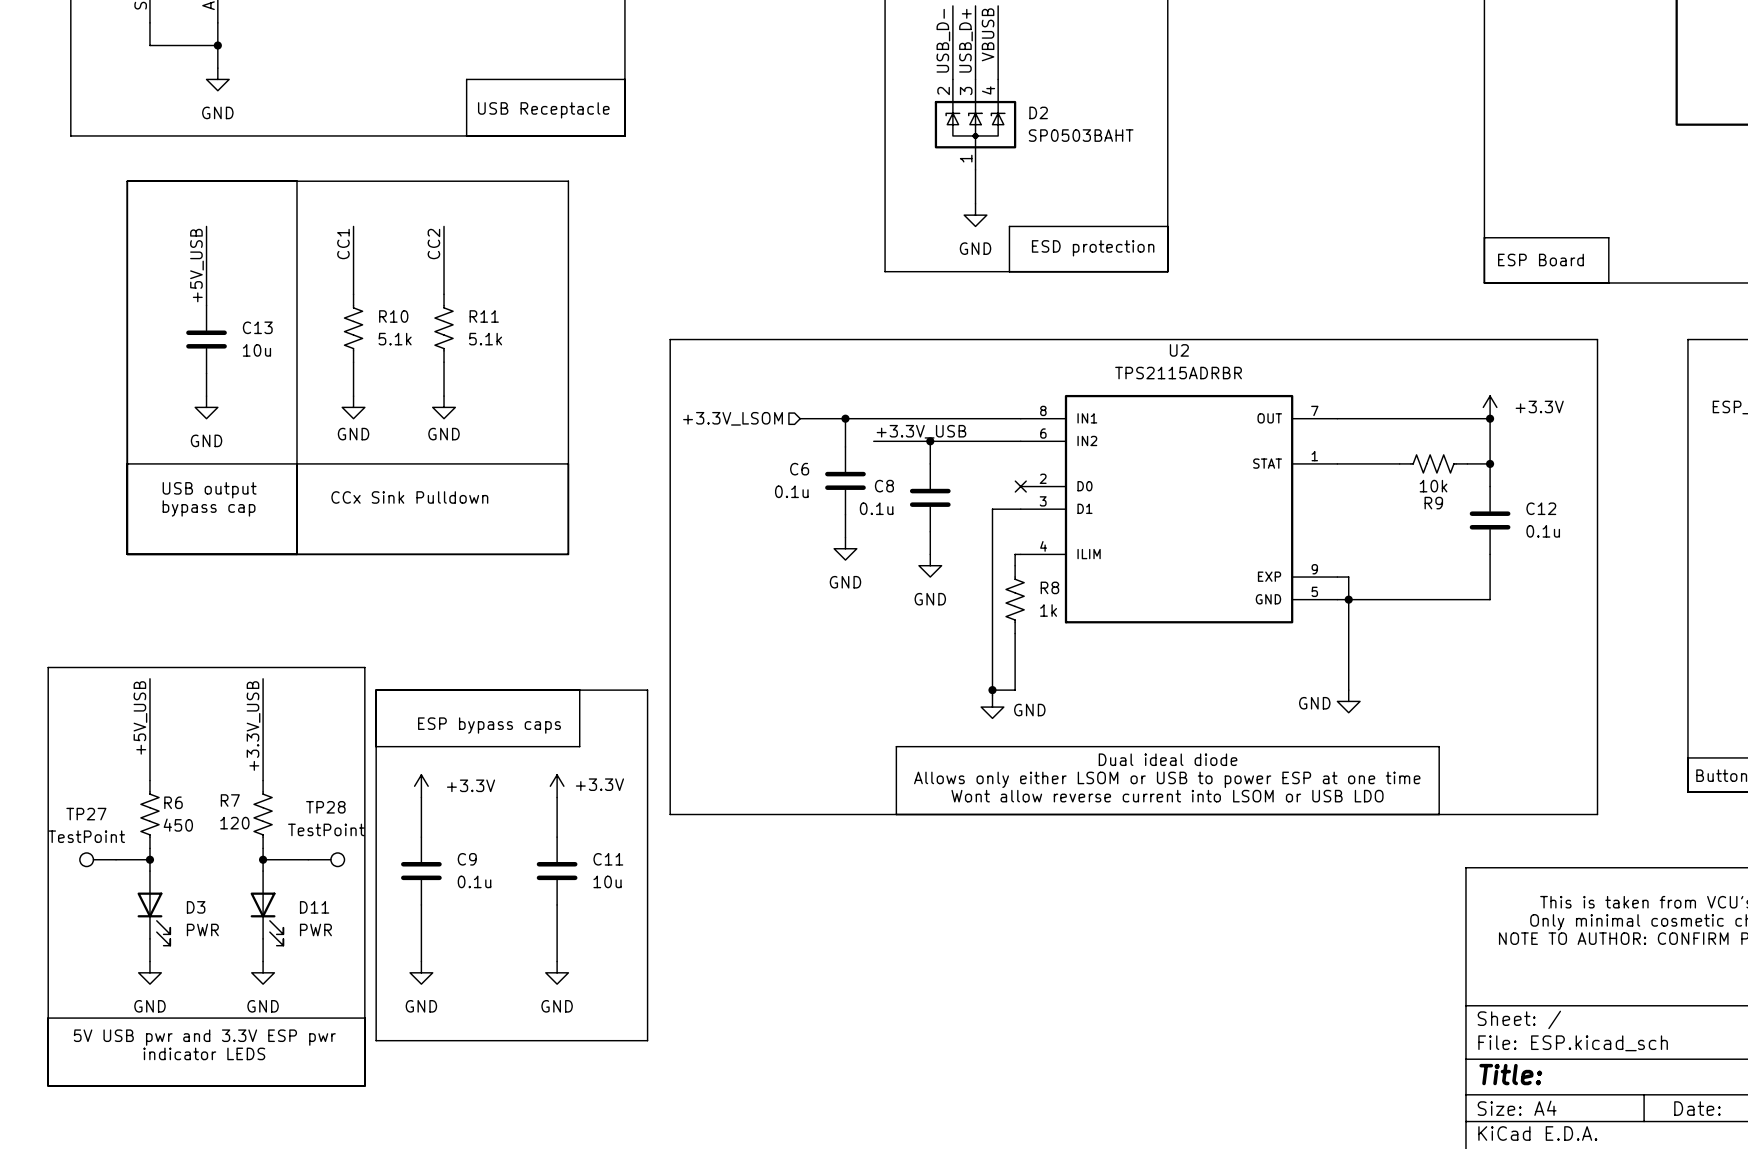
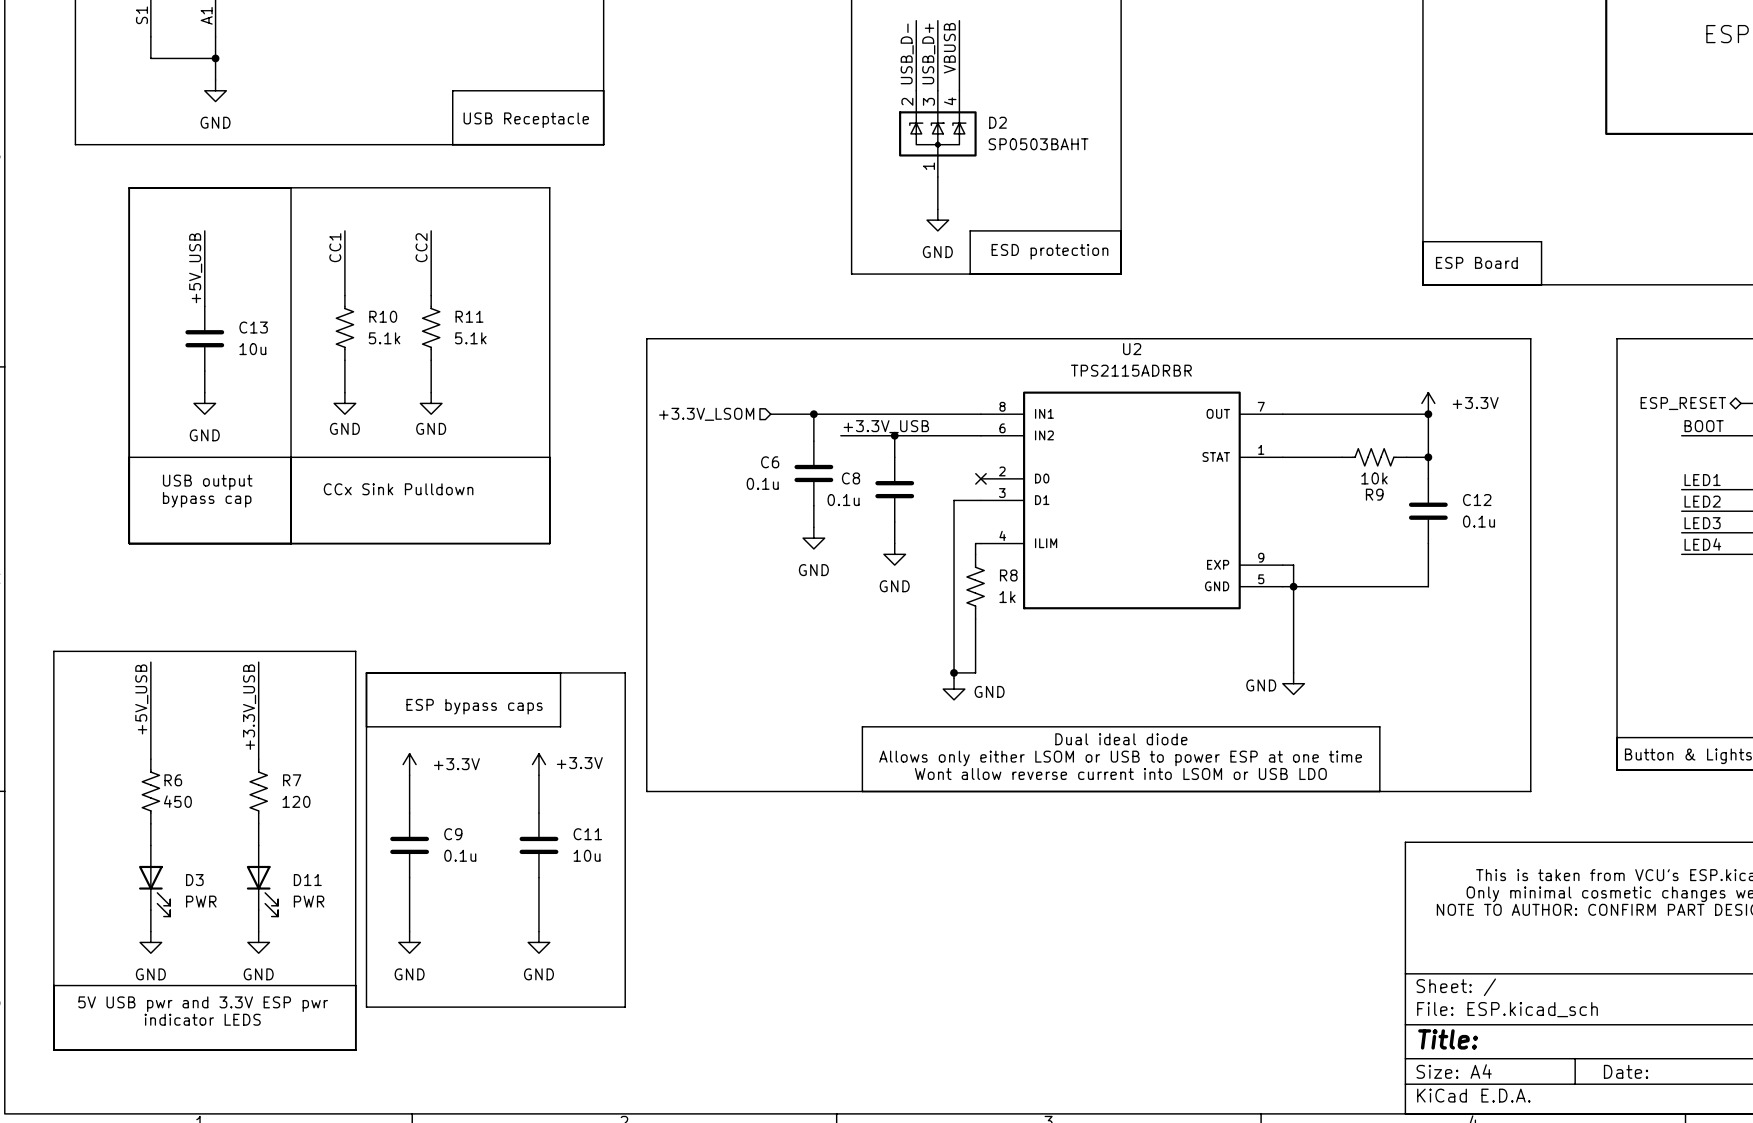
R7 name position: R7 (230, 800) -> R7 (292, 780)
R7 value position: 120 (234, 823) -> 120 (296, 801)
TP27: TestPoint (97, 859) -> none
wire: (116, 859) (149, 859) -> none
junction: (149, 859) -> none
wire: (263, 859) (308, 859) -> none
junction: (263, 859) -> none
TP28: TestPoint (326, 859) -> none

